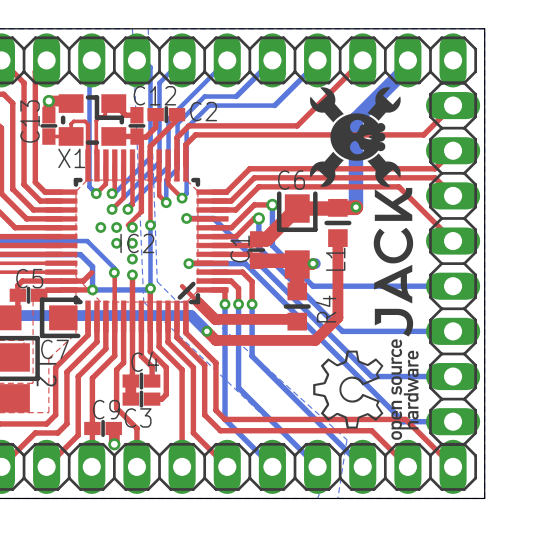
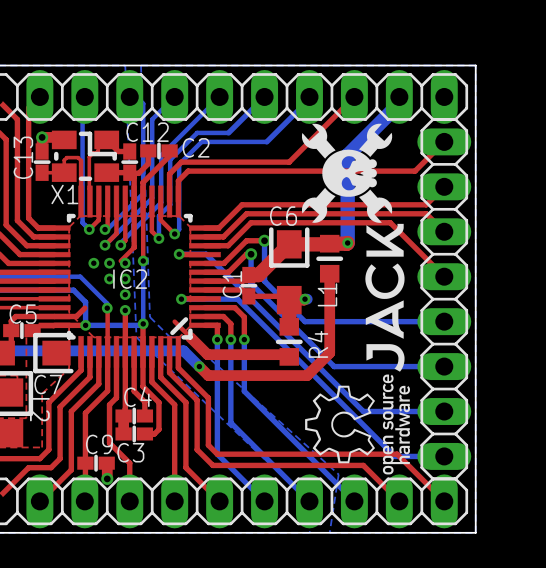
top track width: thick (256, 260) (293, 260) -> thin (248, 296) (285, 296)

